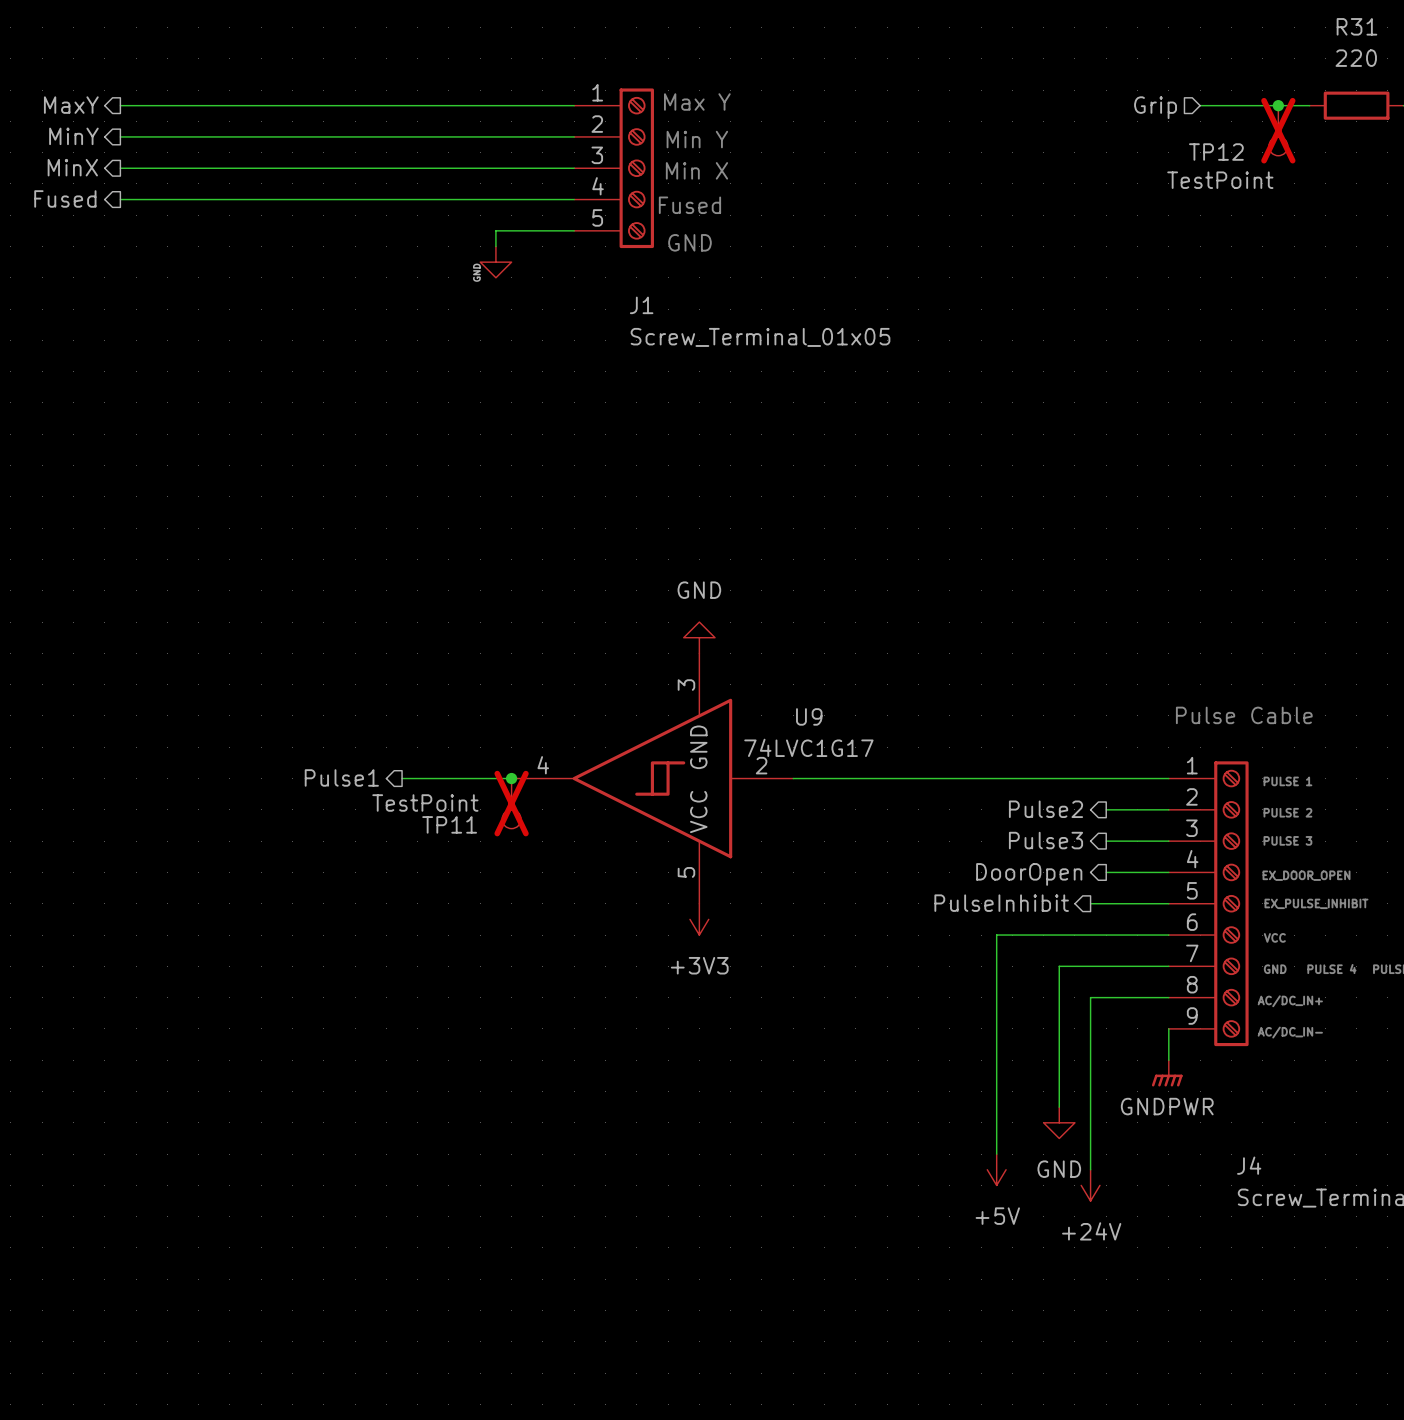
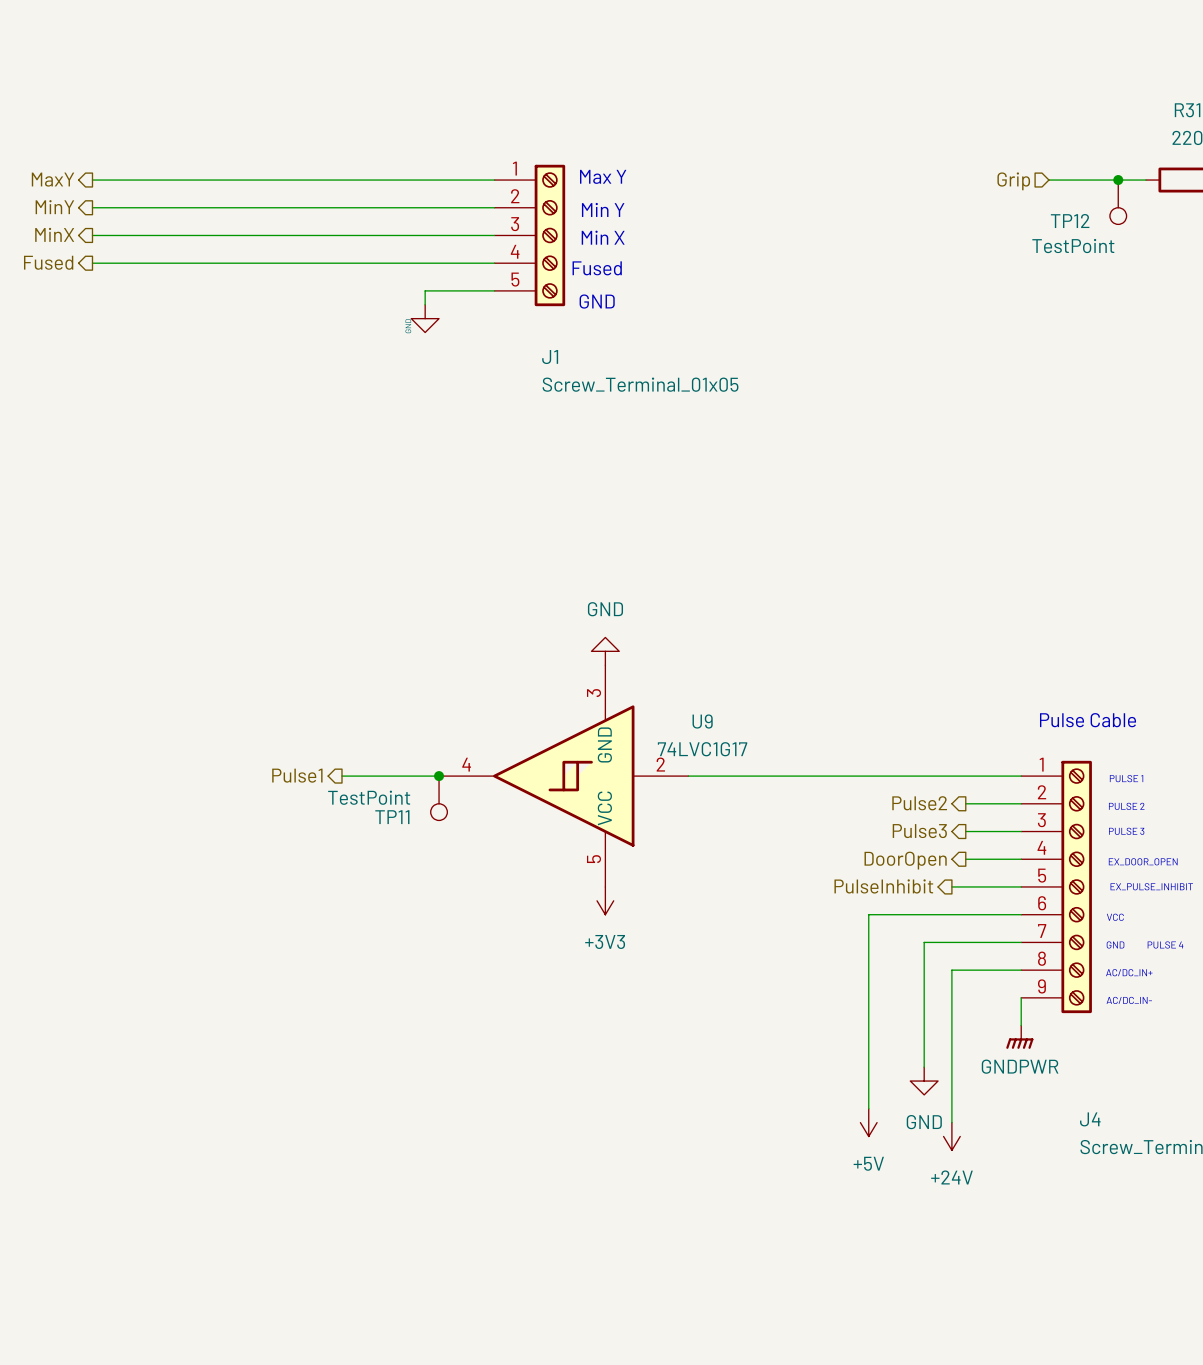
TP12 do-not-place cross: (1278, 130) -> none
TP11 do-not-place cross: (511, 803) -> none

